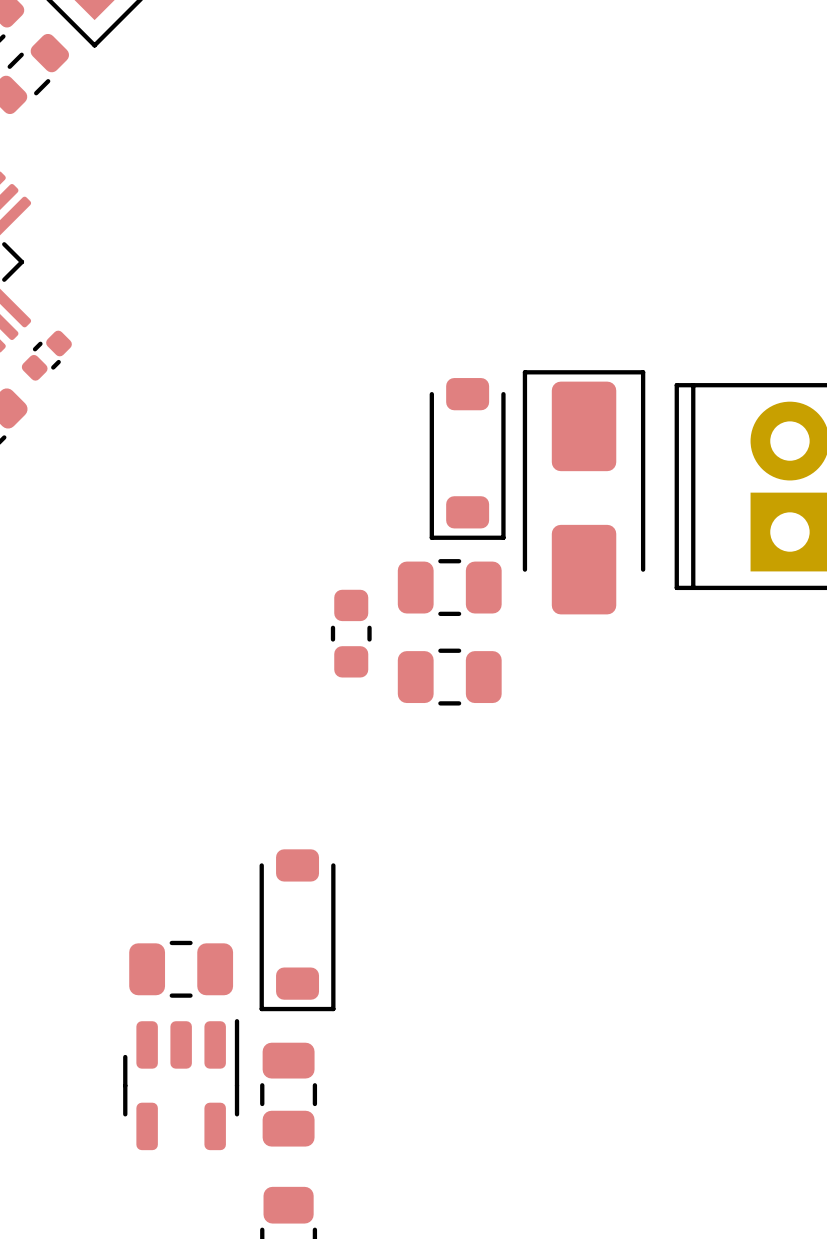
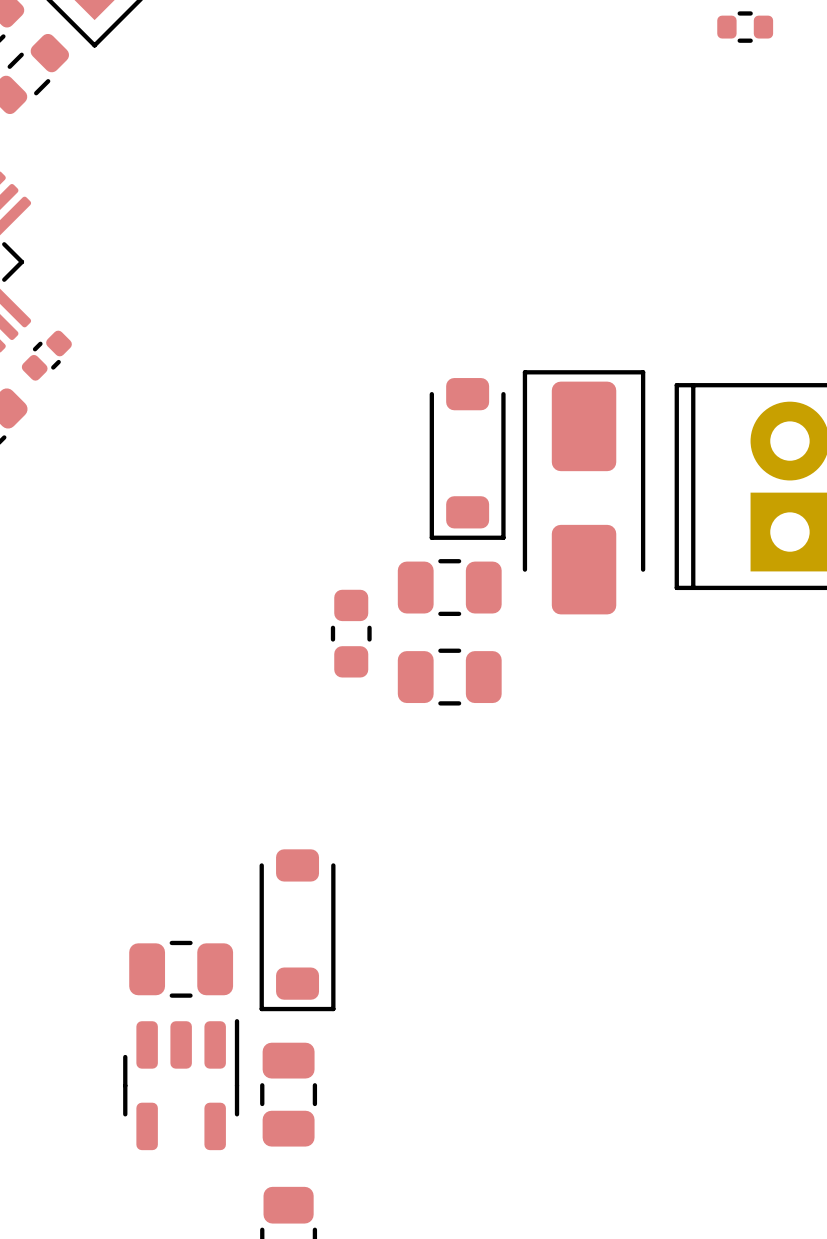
part: none -> (745, 27)

